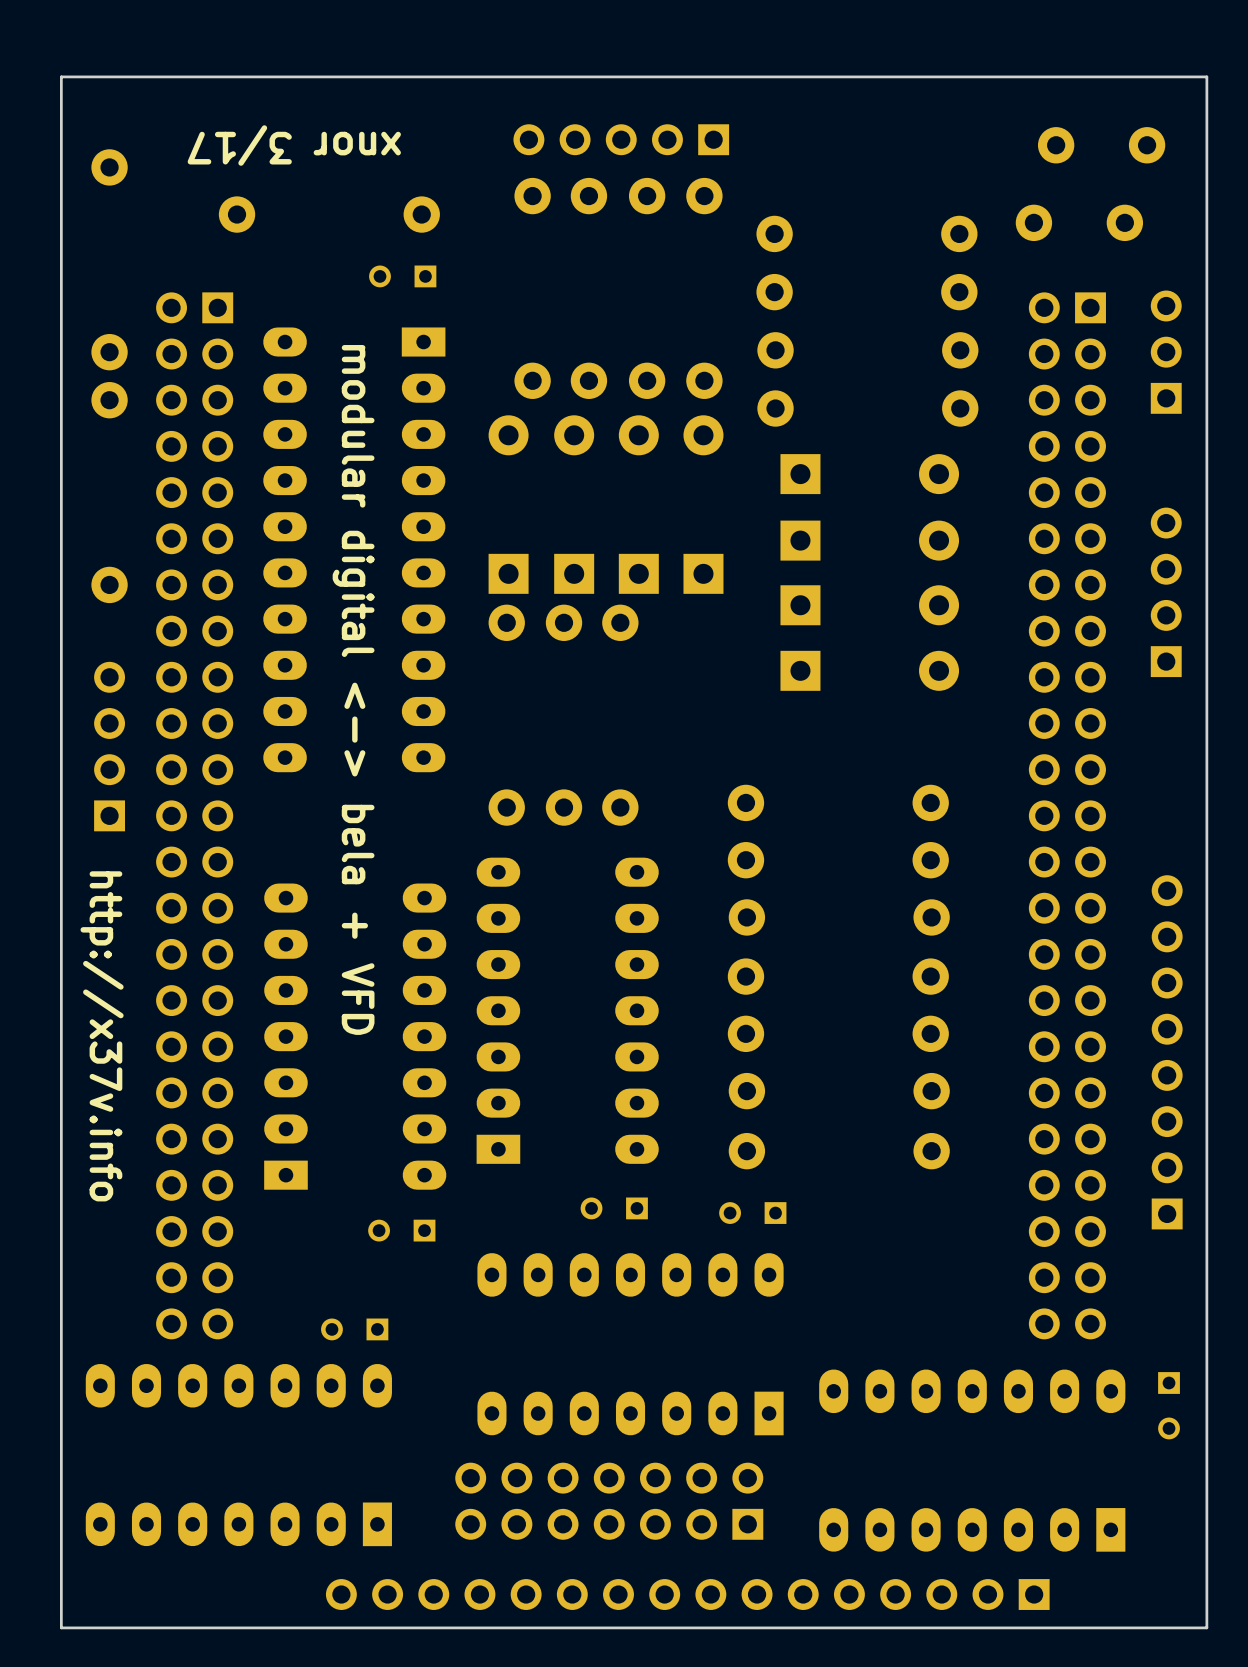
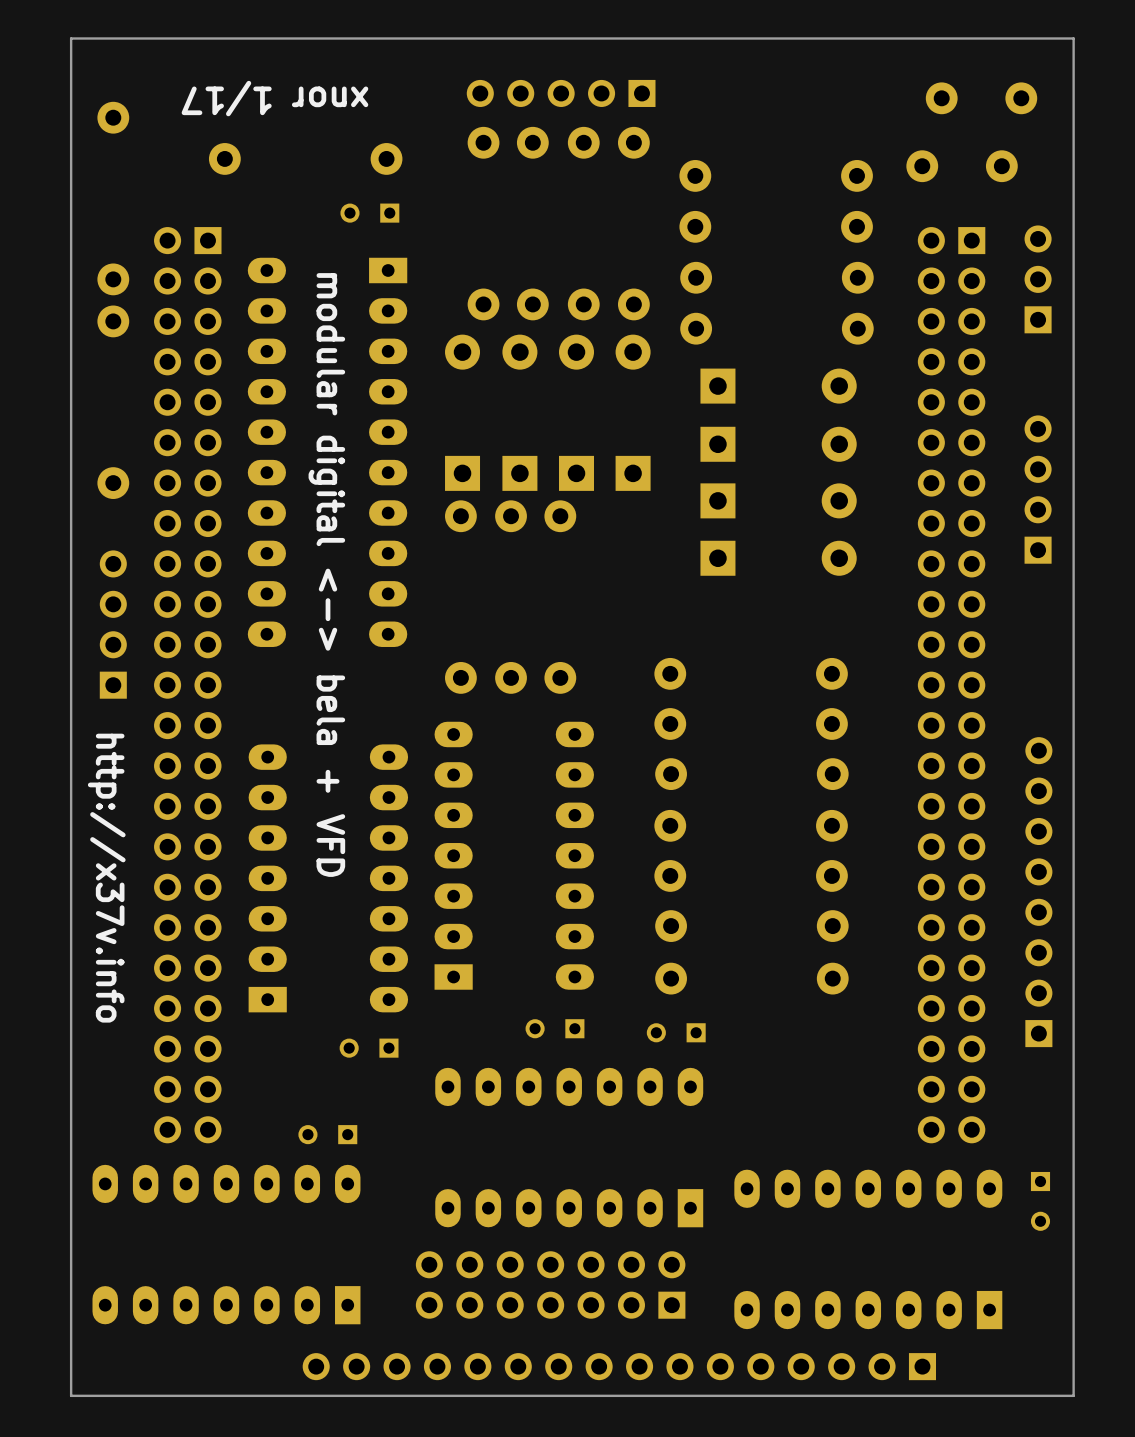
text: xnor 3/17 (294, 145) -> xnor 1/17 (274, 98)

